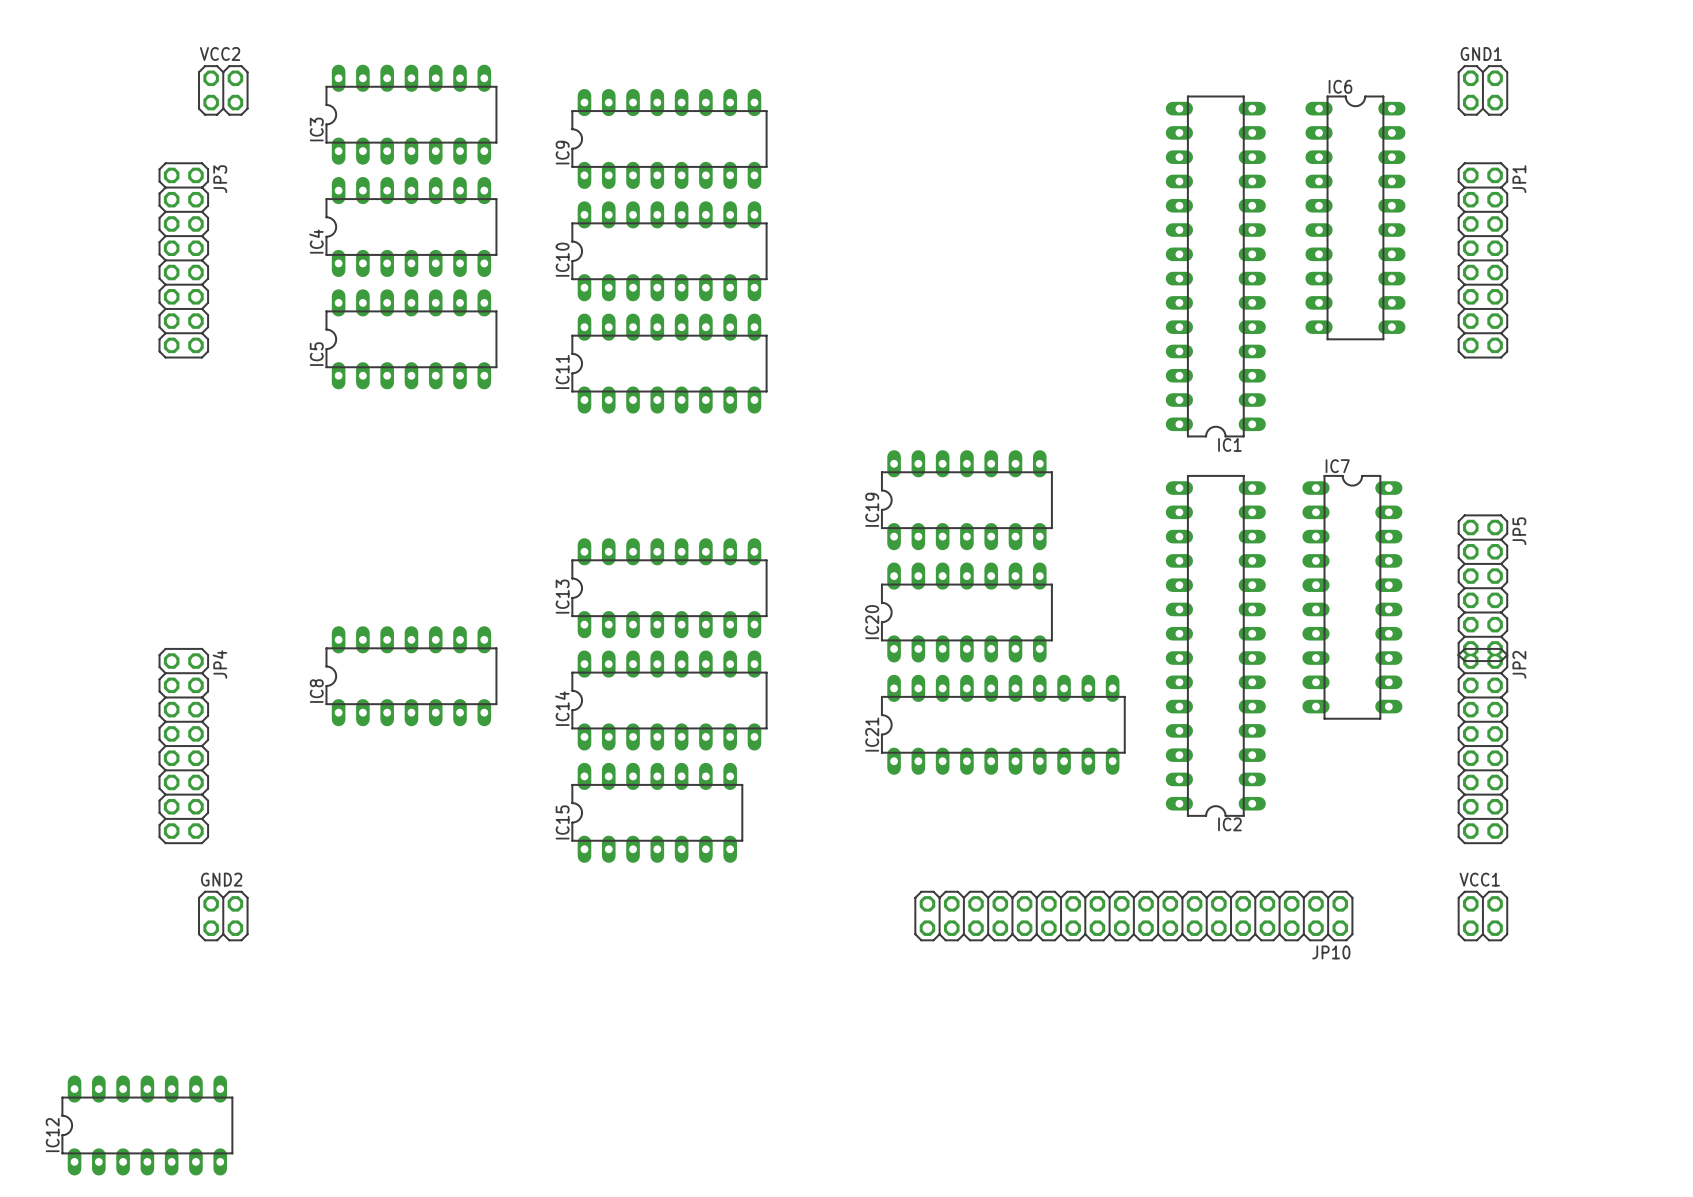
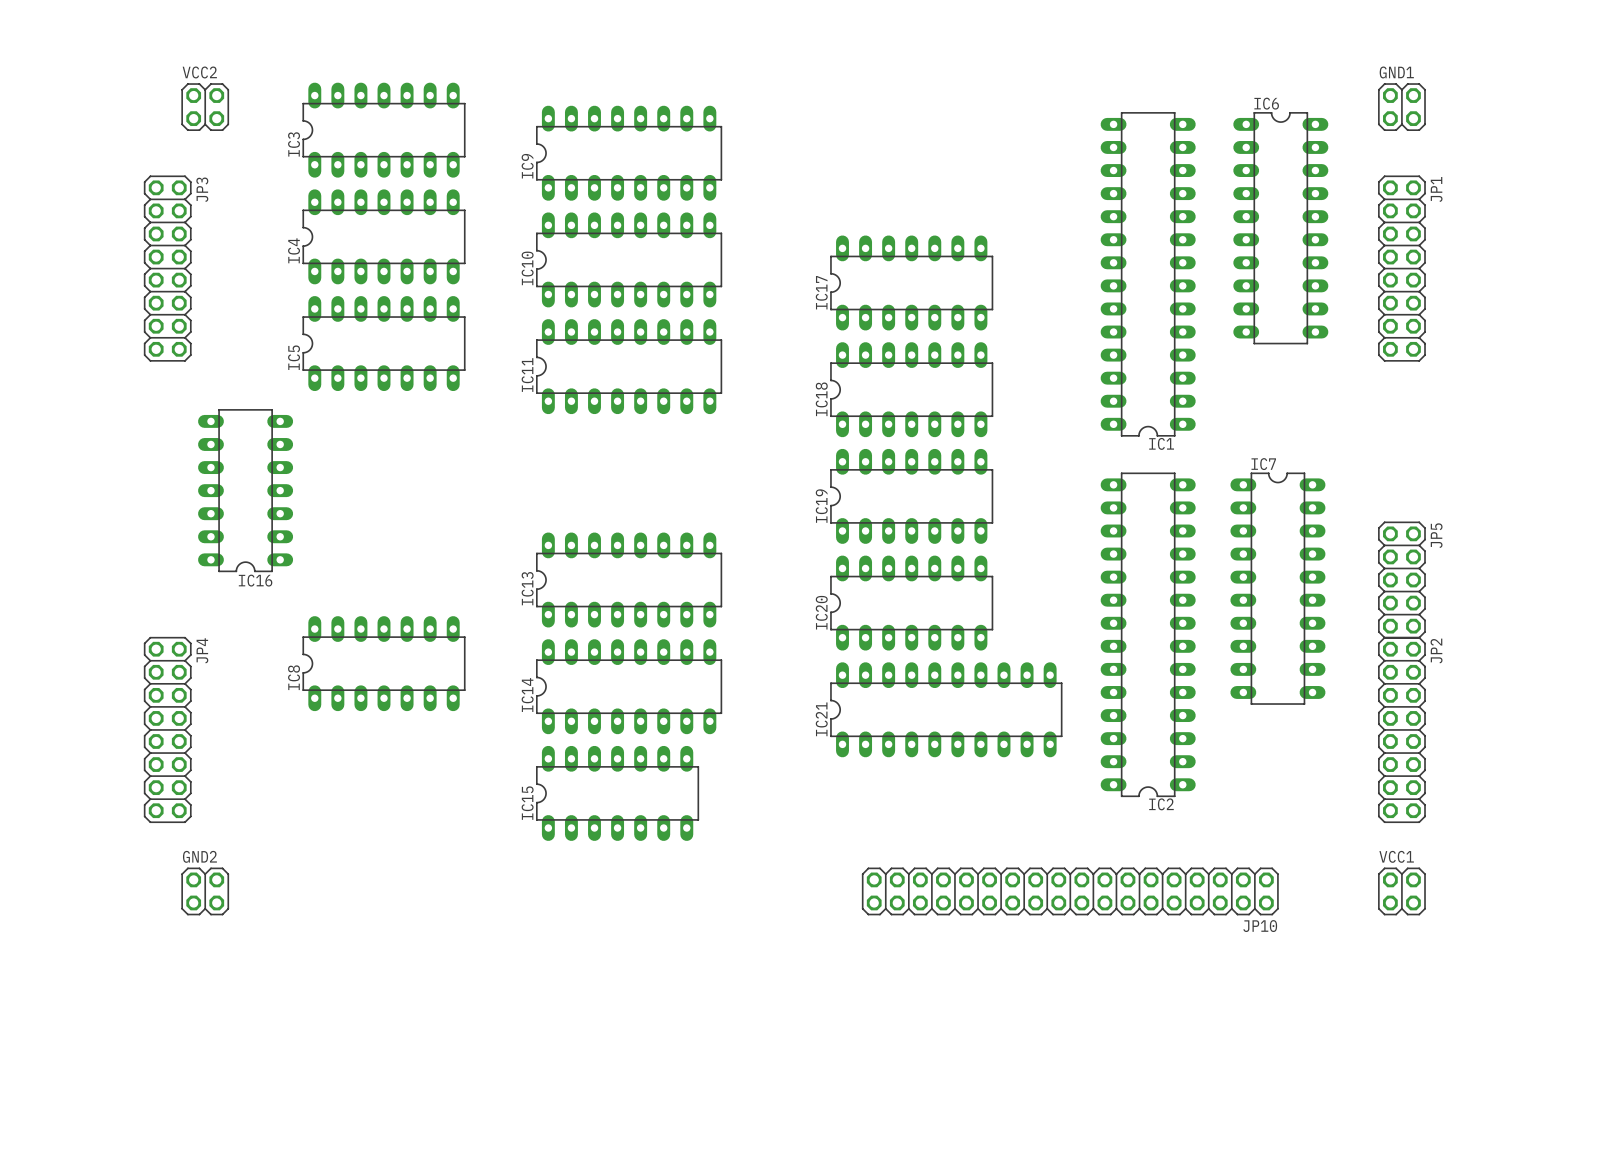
IC17: none -> (911, 282)
IC18: none -> (911, 389)
IC16: none -> (245, 490)
JP5 footprint: [1457, 514, 1508, 662] -> [1378, 521, 1426, 639]
IC12: (147, 1125) -> none

